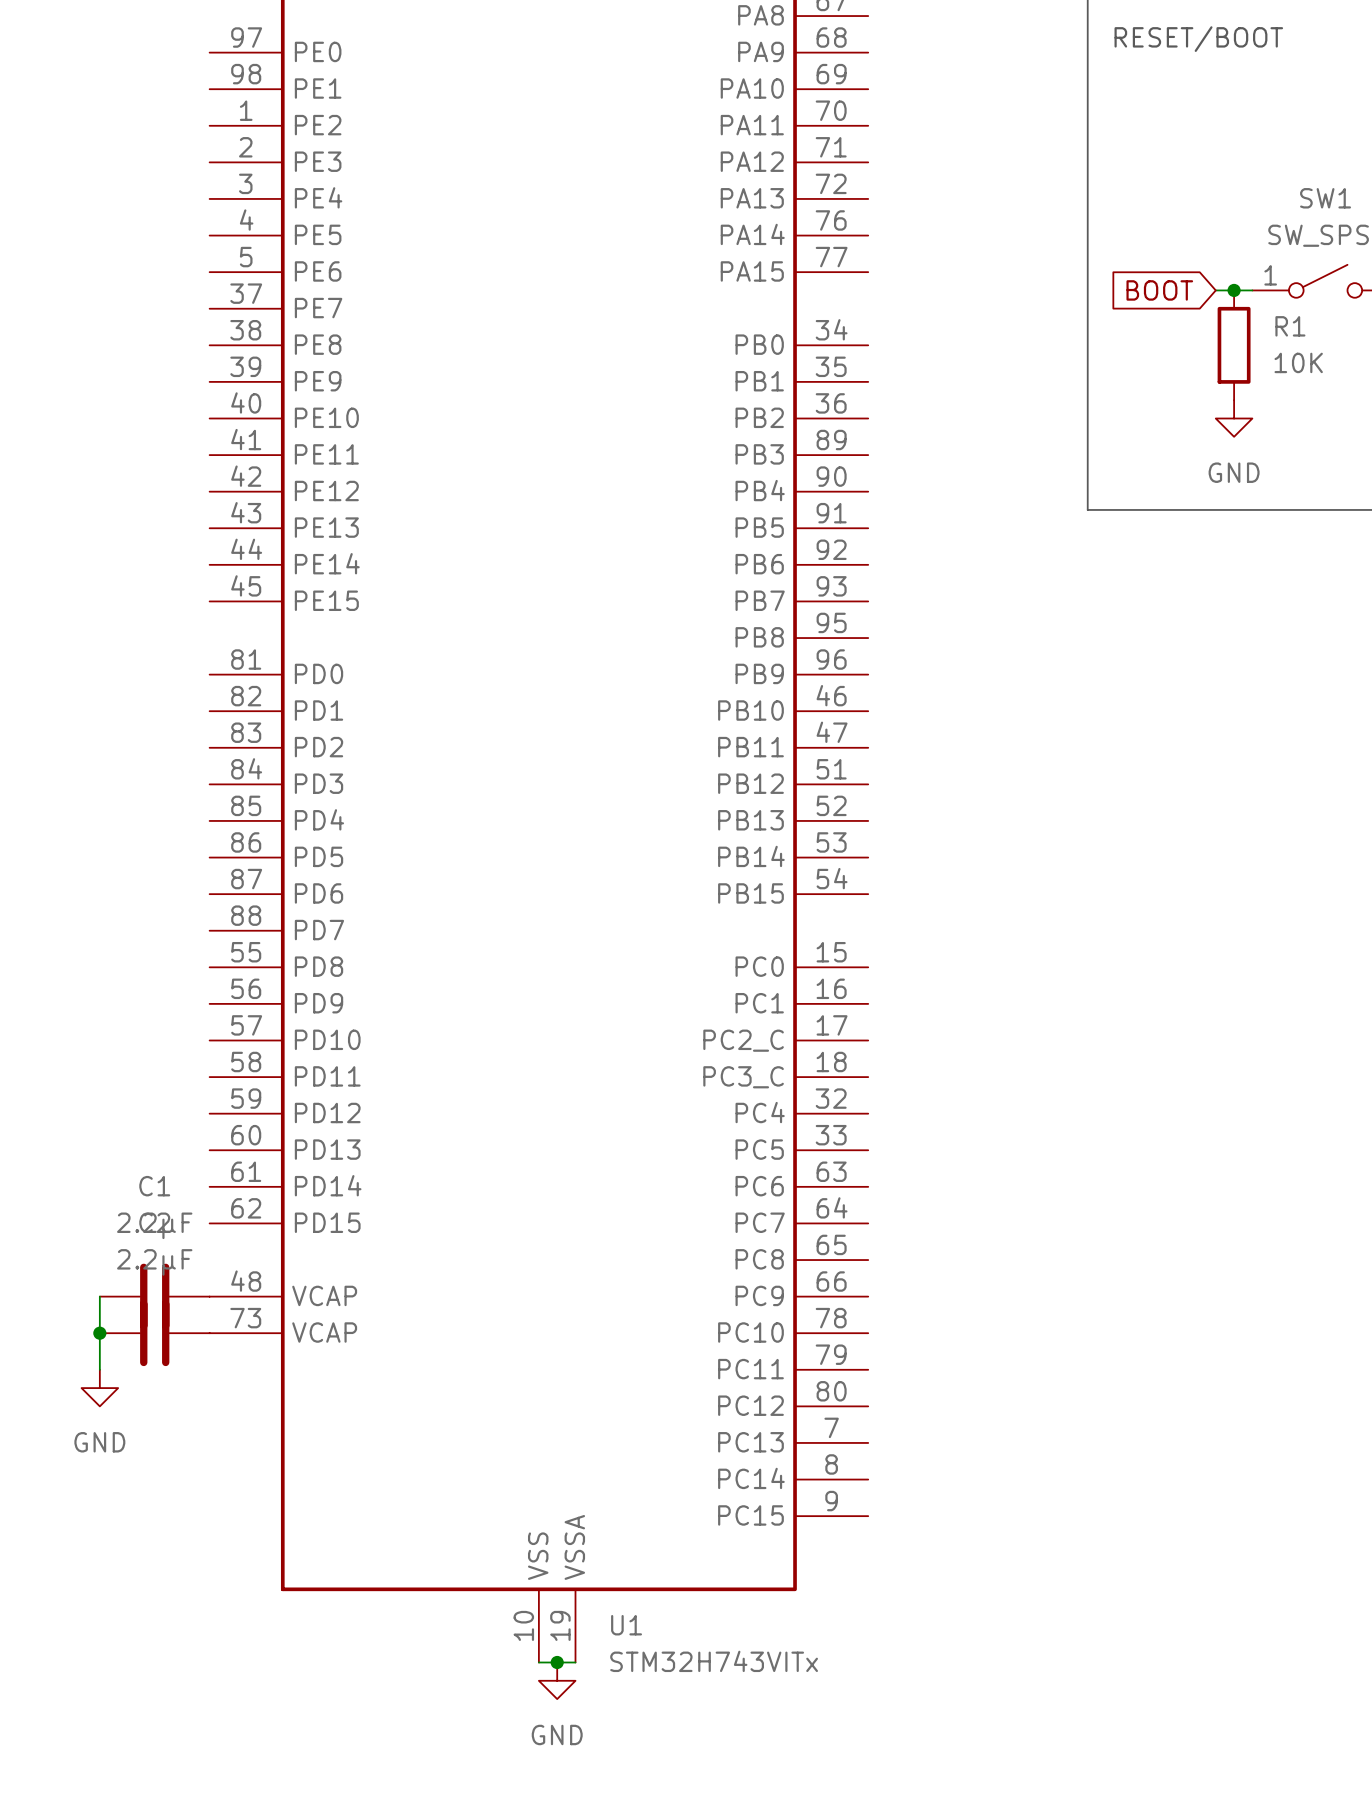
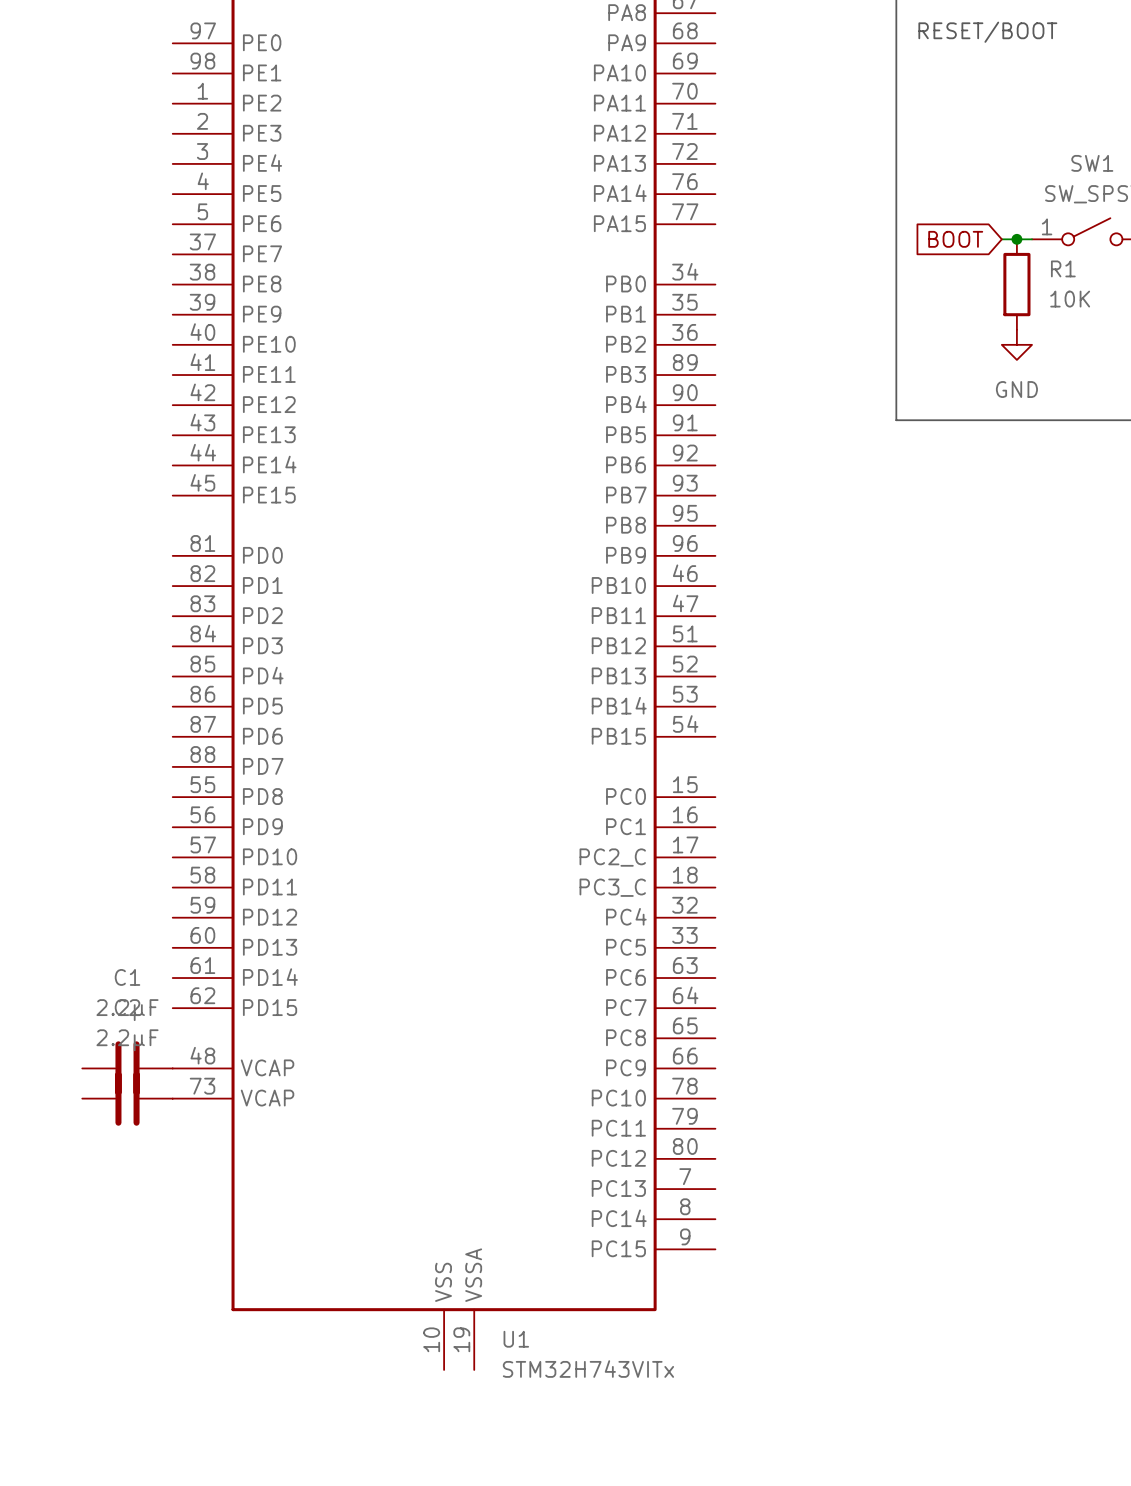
wire: (99, 1296) (99, 1369) -> none
junction: (99, 1333) -> none
power symbol: GND (99, 1388) -> none
wire: (538, 1662) (575, 1662) -> none
junction: (557, 1662) -> none
power symbol: GND (557, 1680) -> none

